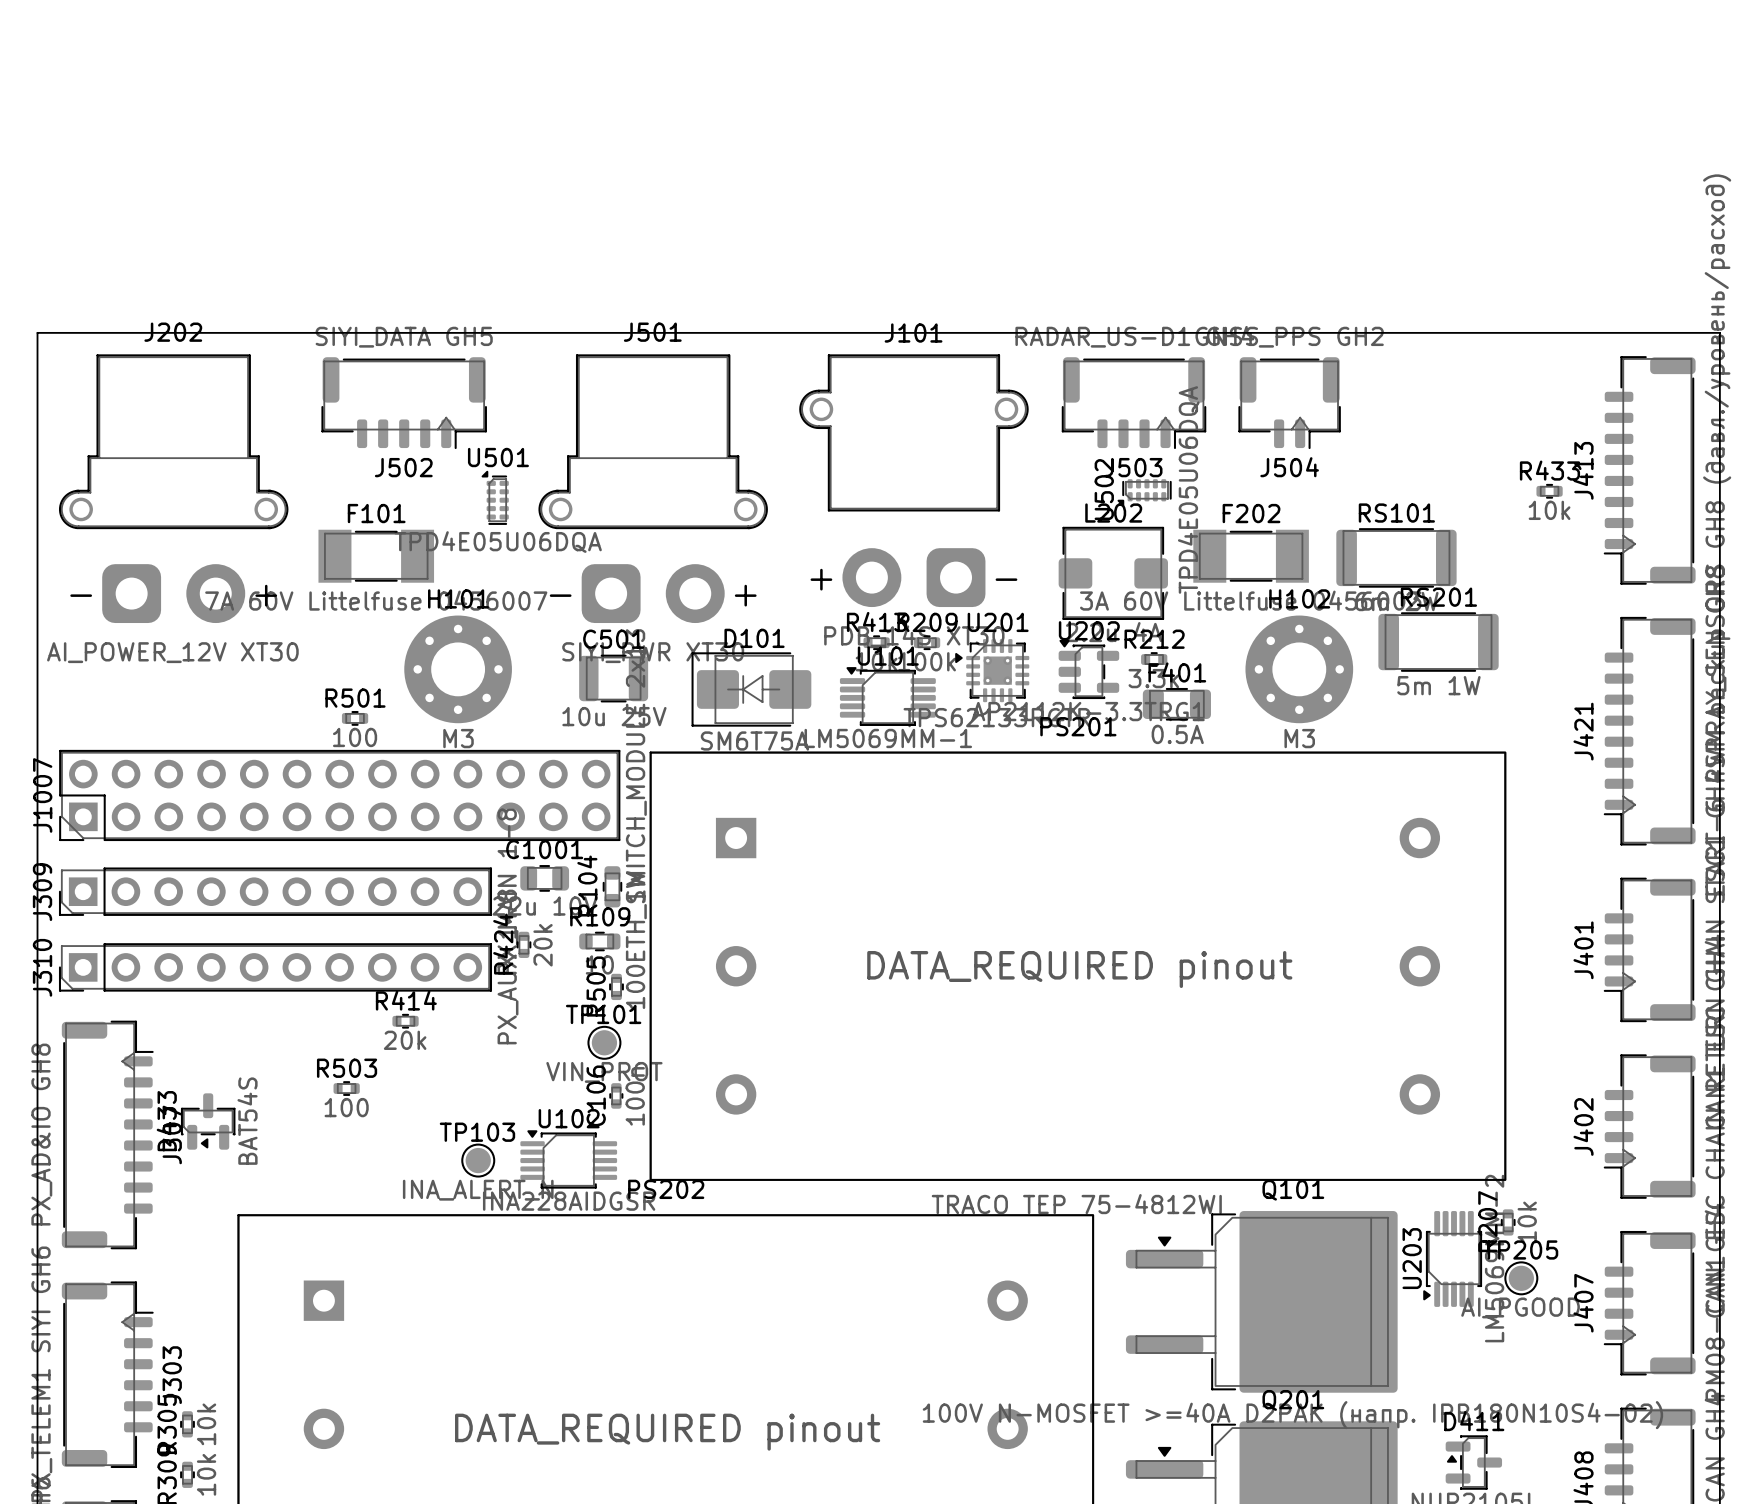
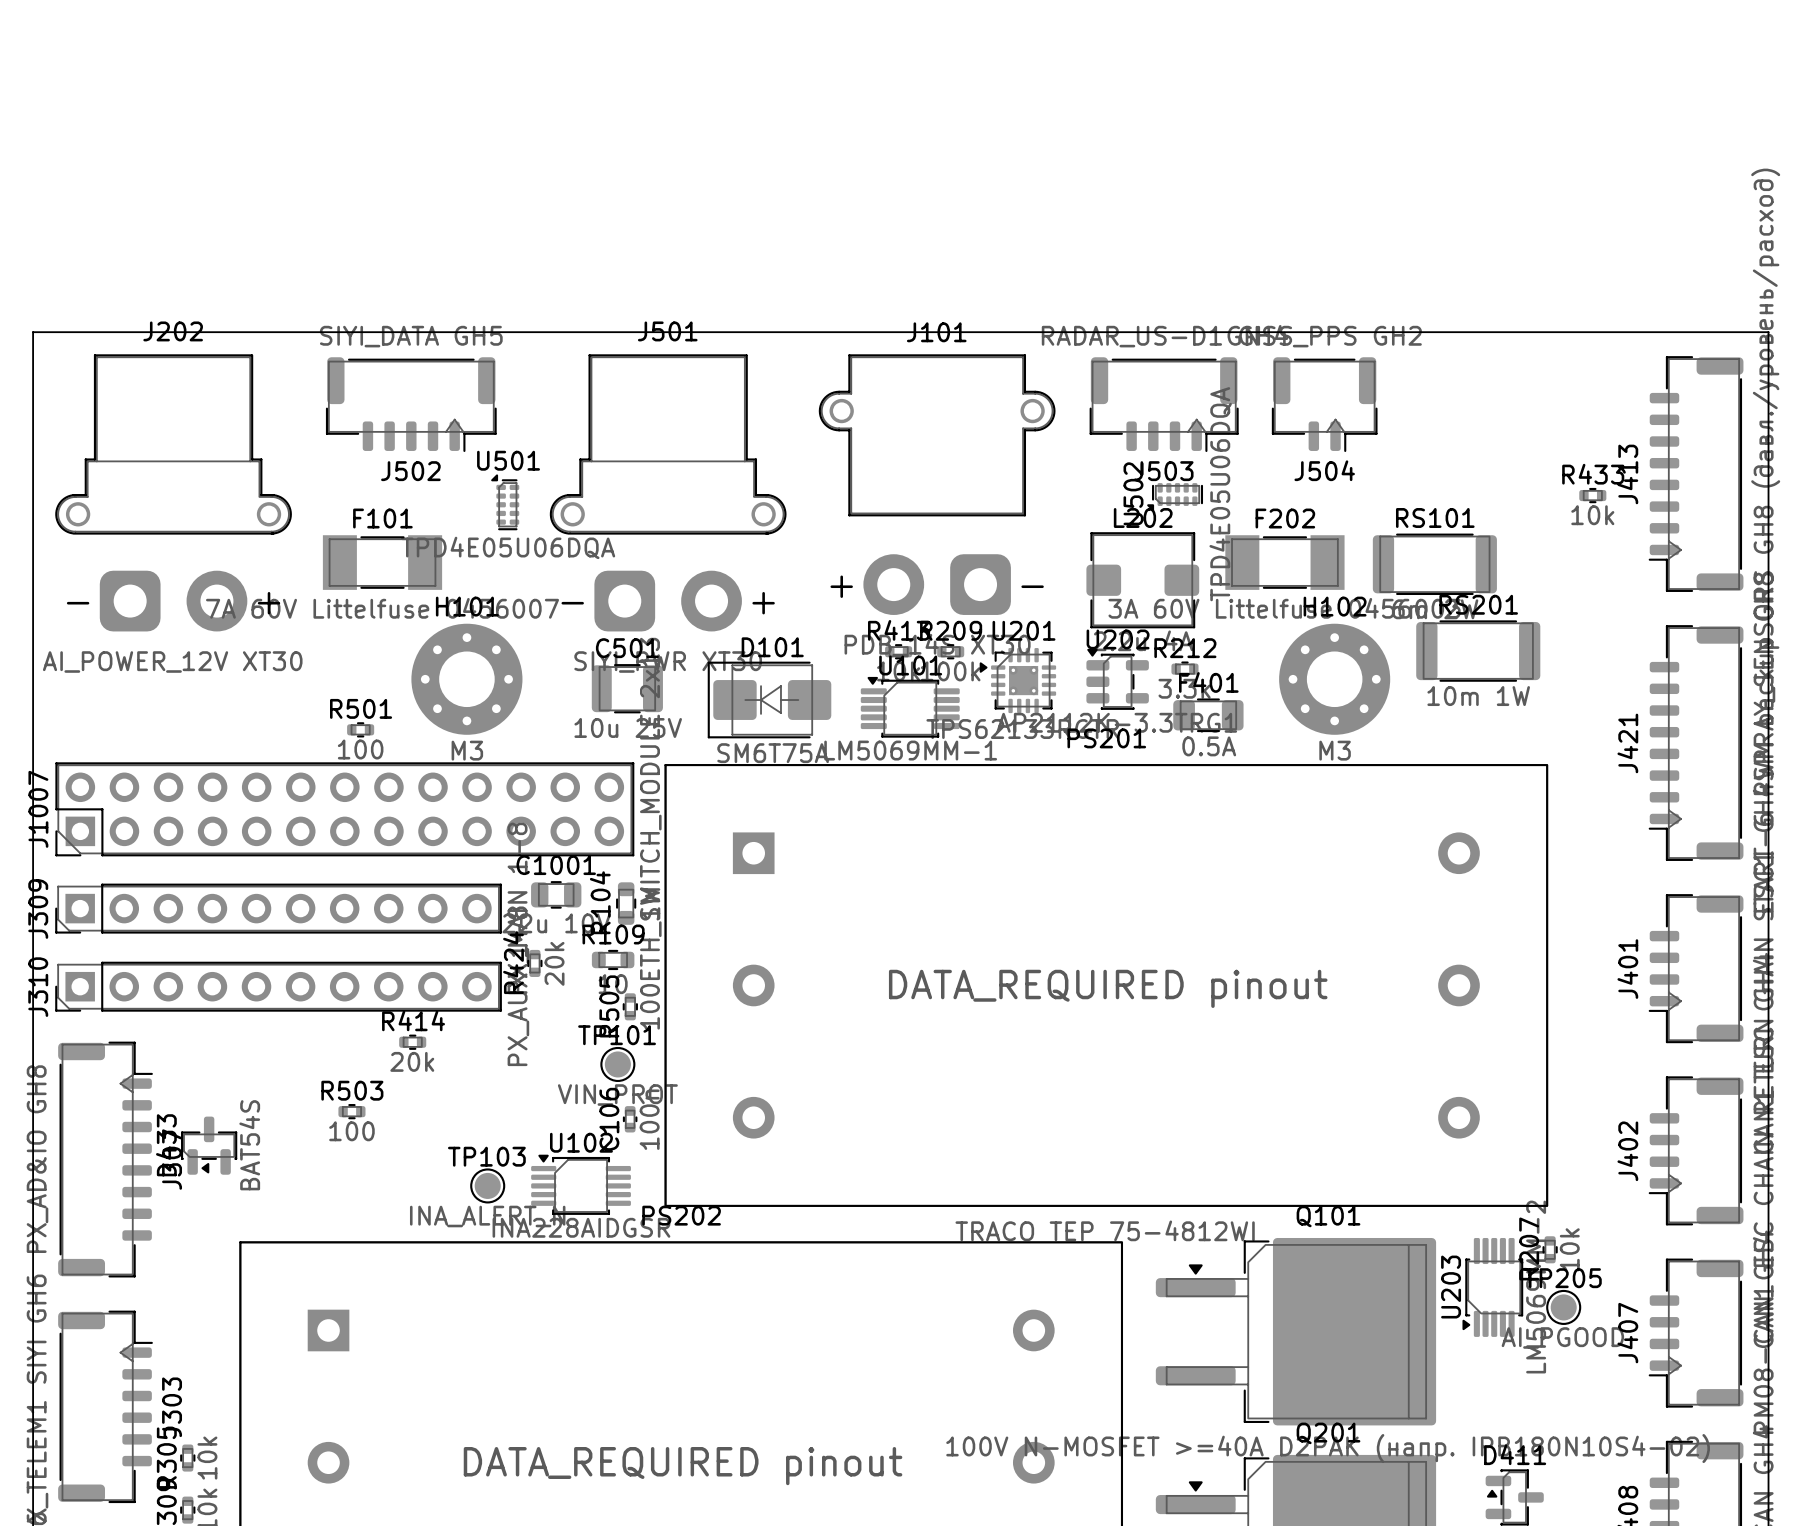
RS201 value: 5m 1W (1438, 685) -> 10m 1W (1478, 696)

